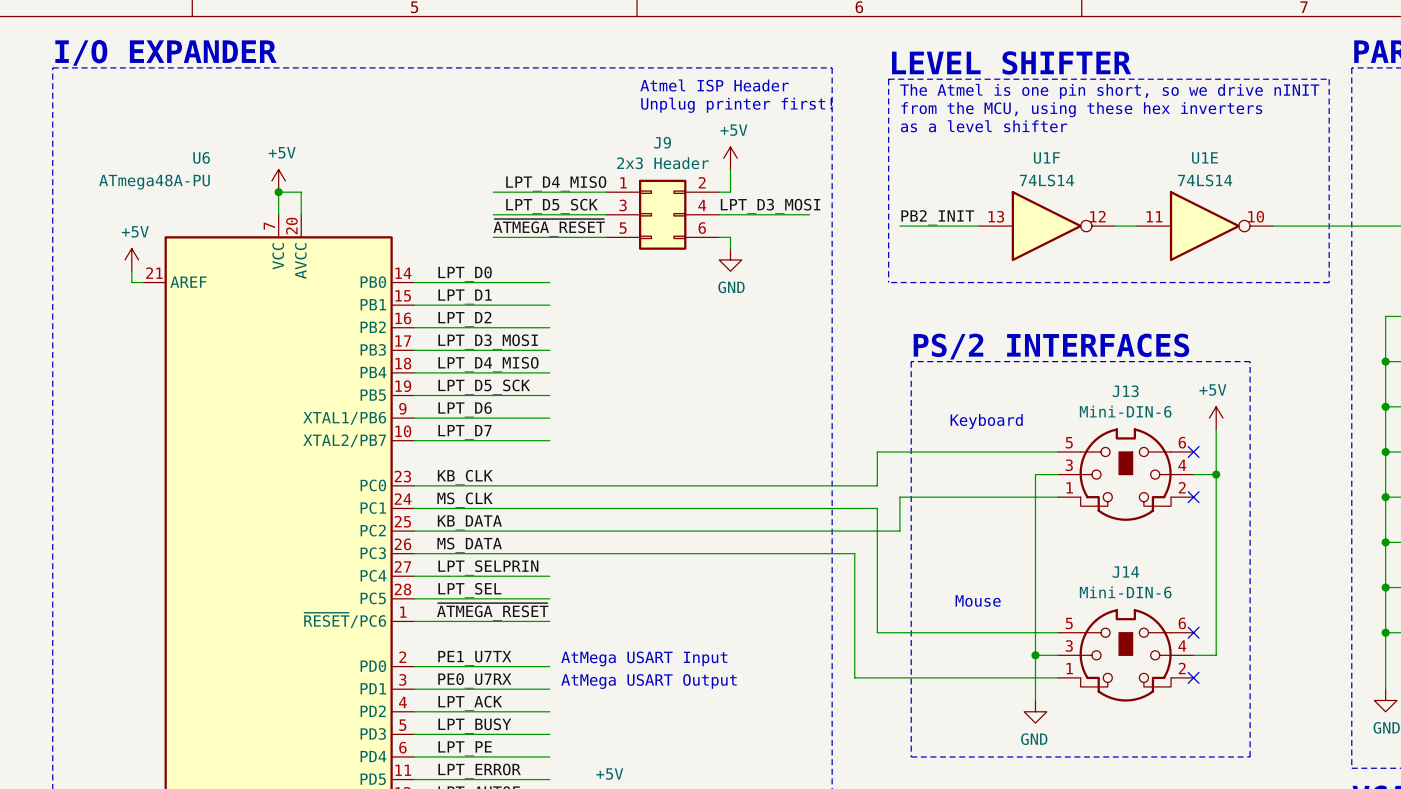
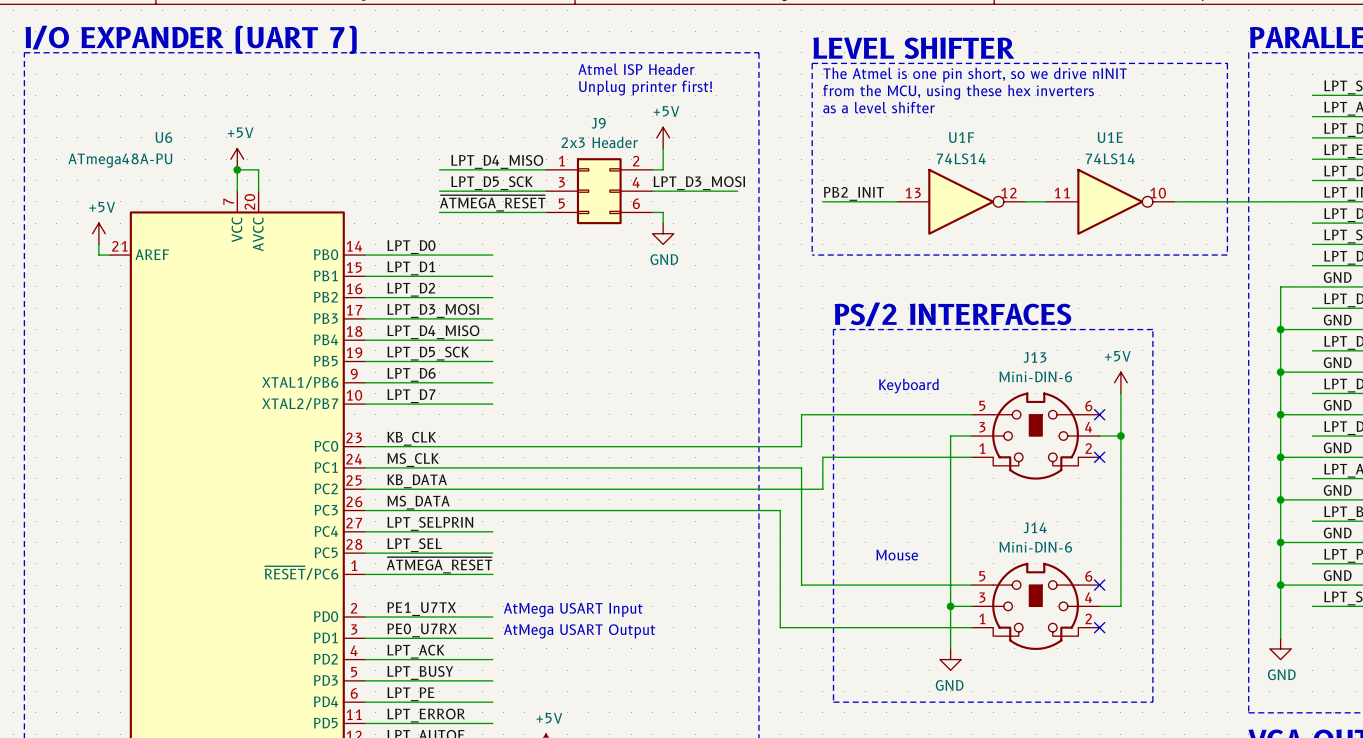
text: I/O EXPANDER (165, 52) -> I/O EXPANDER (UART 7) (191, 39)

